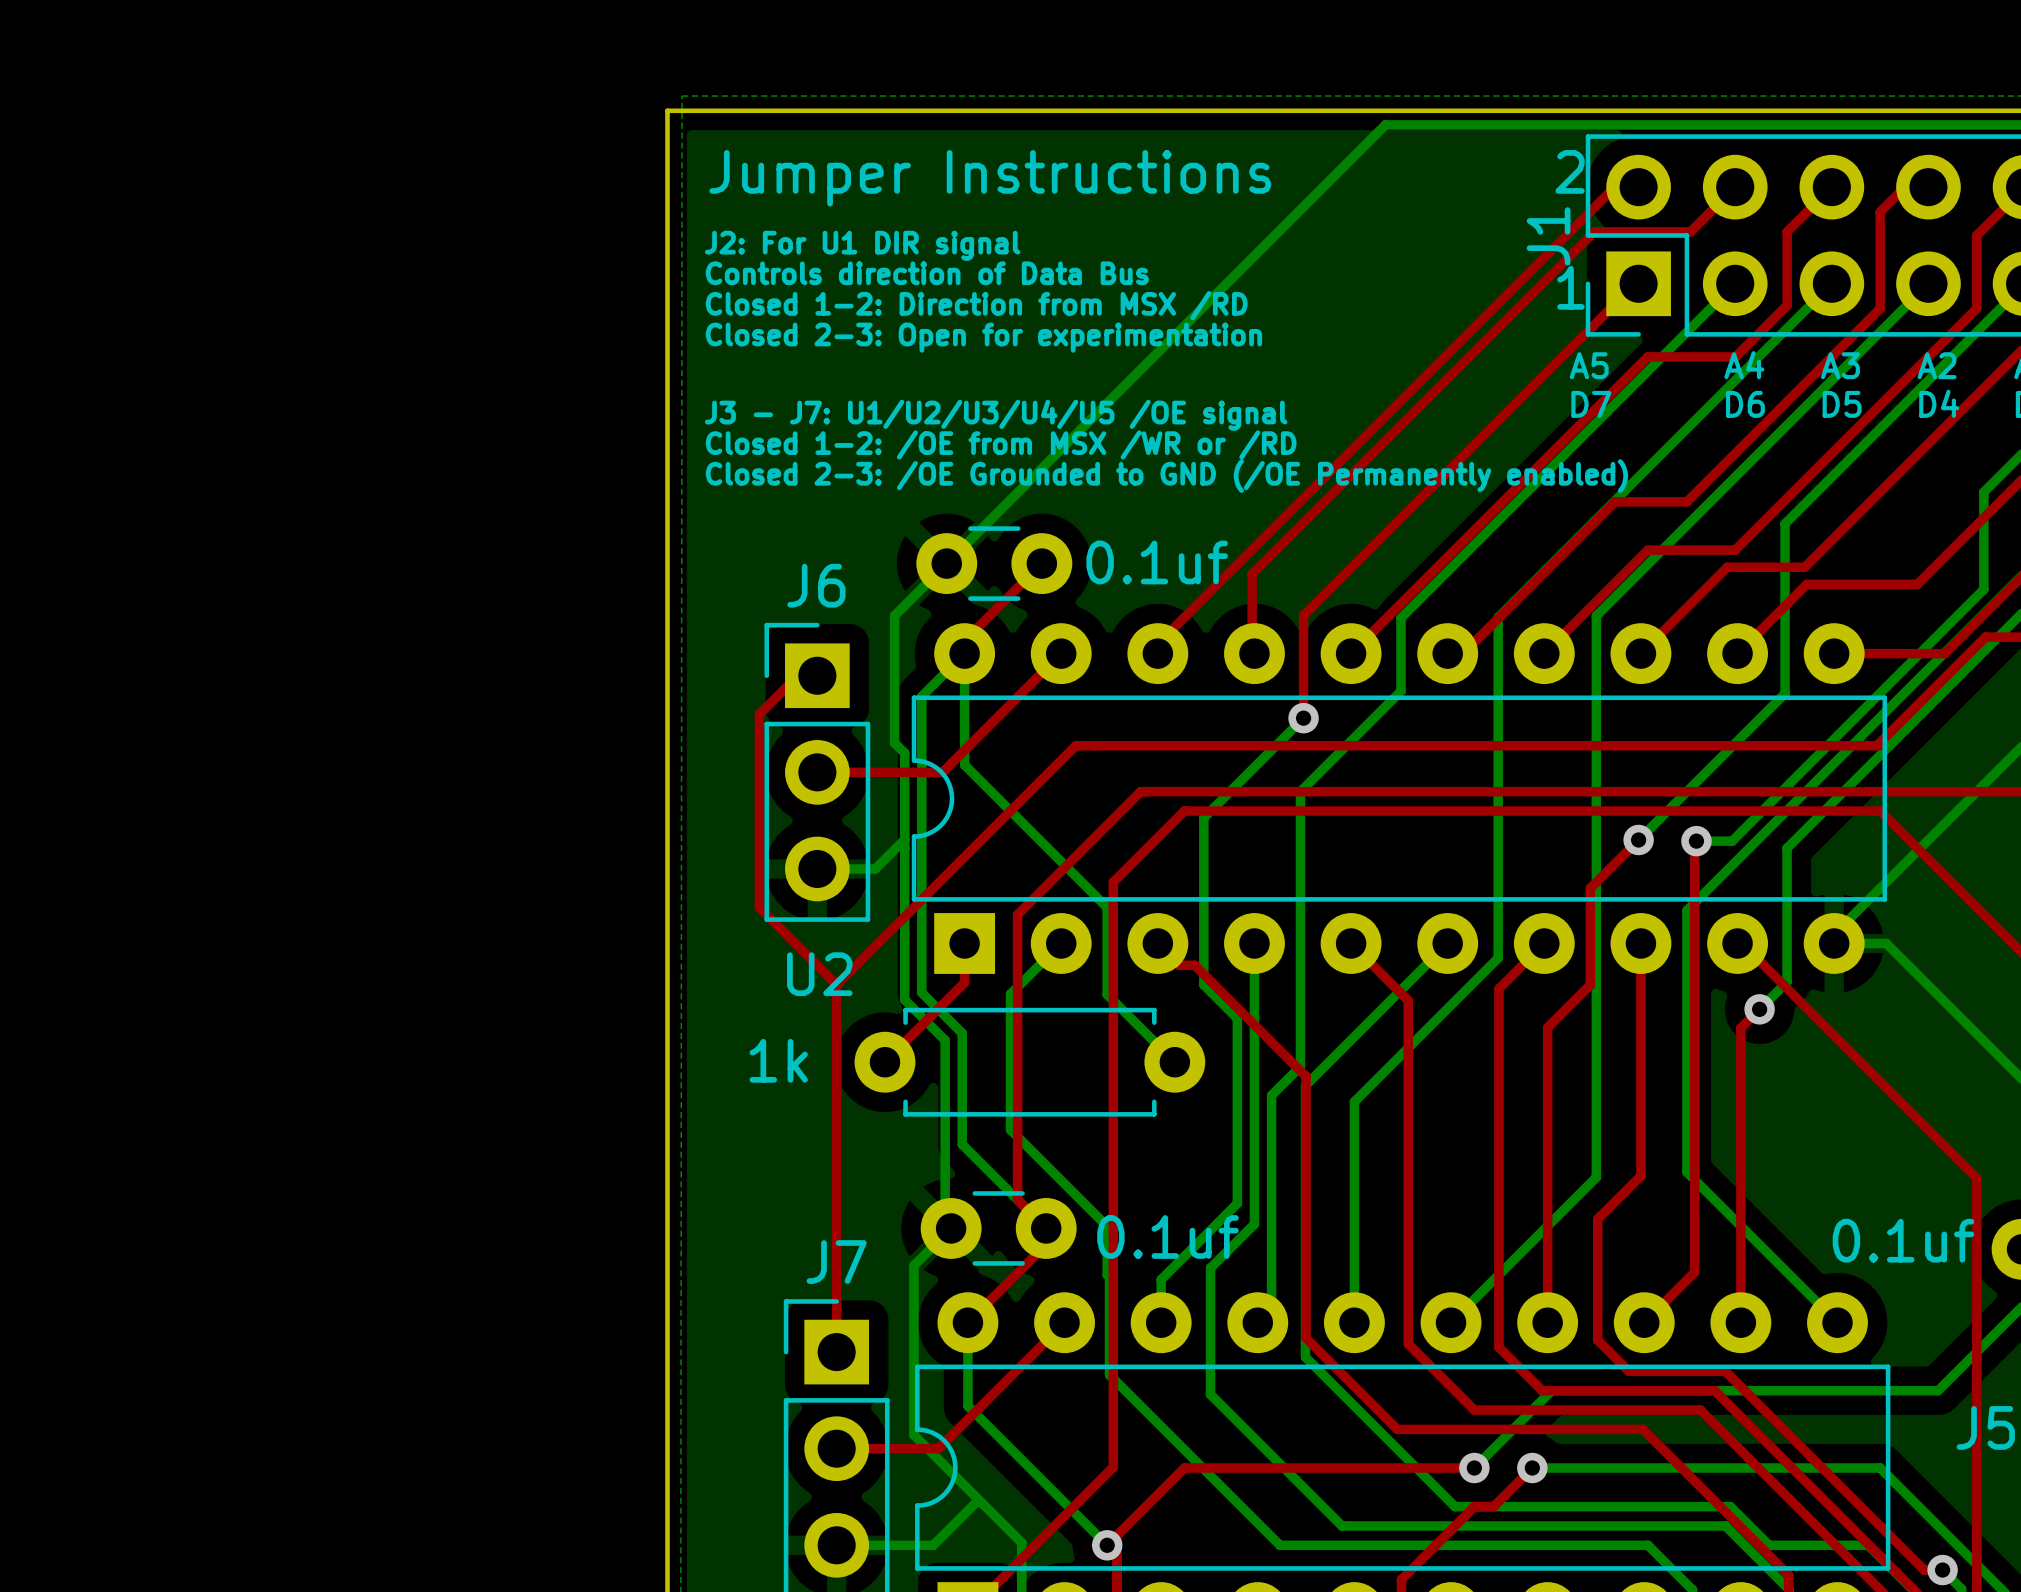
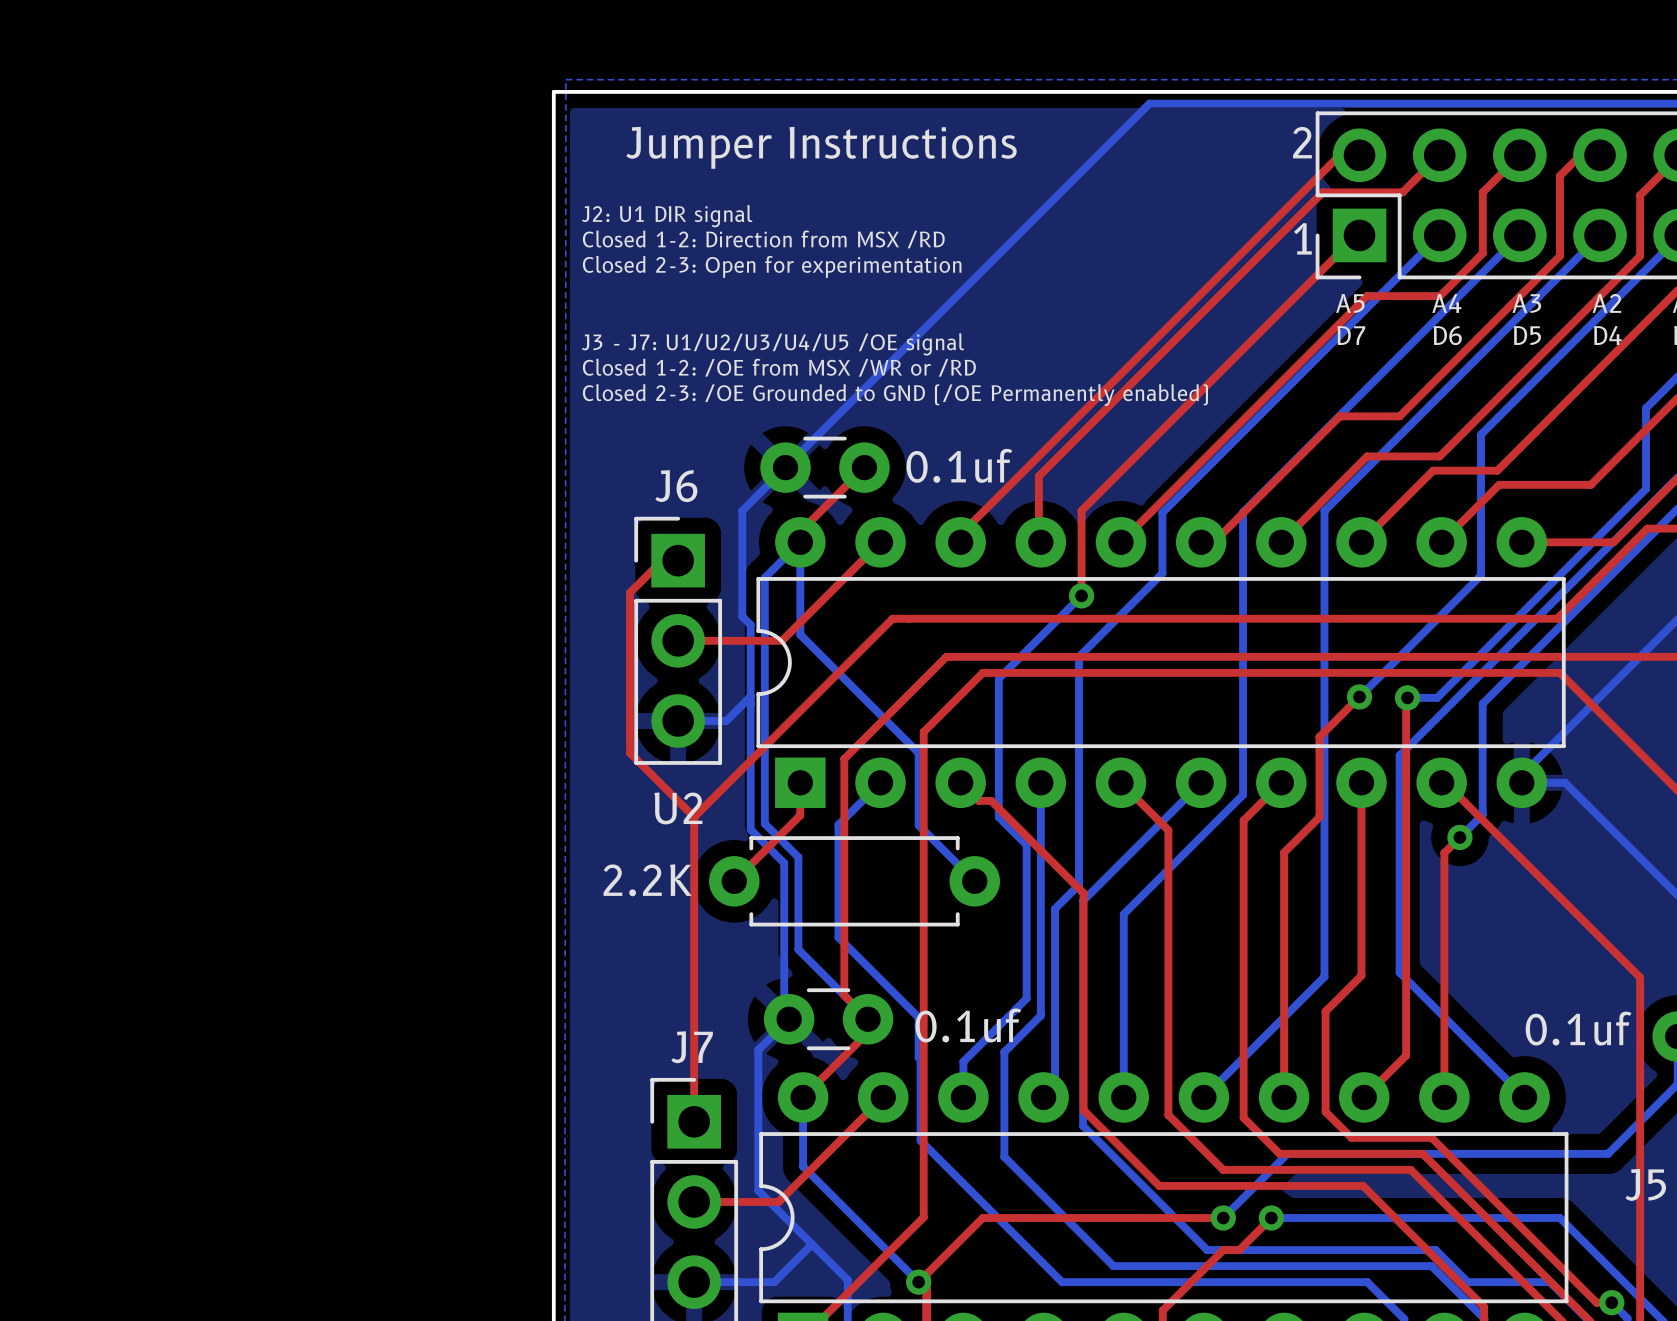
J1 name: J1 (1548, 236) -> none
text: J2: For U1 DIR signal (862, 245) -> J2: U1 DIR signal (667, 216)
text: Controls direction of Data Bus (927, 273) -> none
text position: Closed 1-2: Direction from MSX /RD (976, 305) -> Closed 1-2: Direction from MSX /RD (763, 239)
text position: Closed 2-3: Open for experimentation (983, 337) -> Closed 2-3: Open for experimentation (772, 266)
text position: A5 (1589, 365) -> A5 (1350, 303)
text position: D7 (1591, 404) -> D7 (1351, 335)
part value: 1k (778, 1060) -> 2.2K (647, 880)

